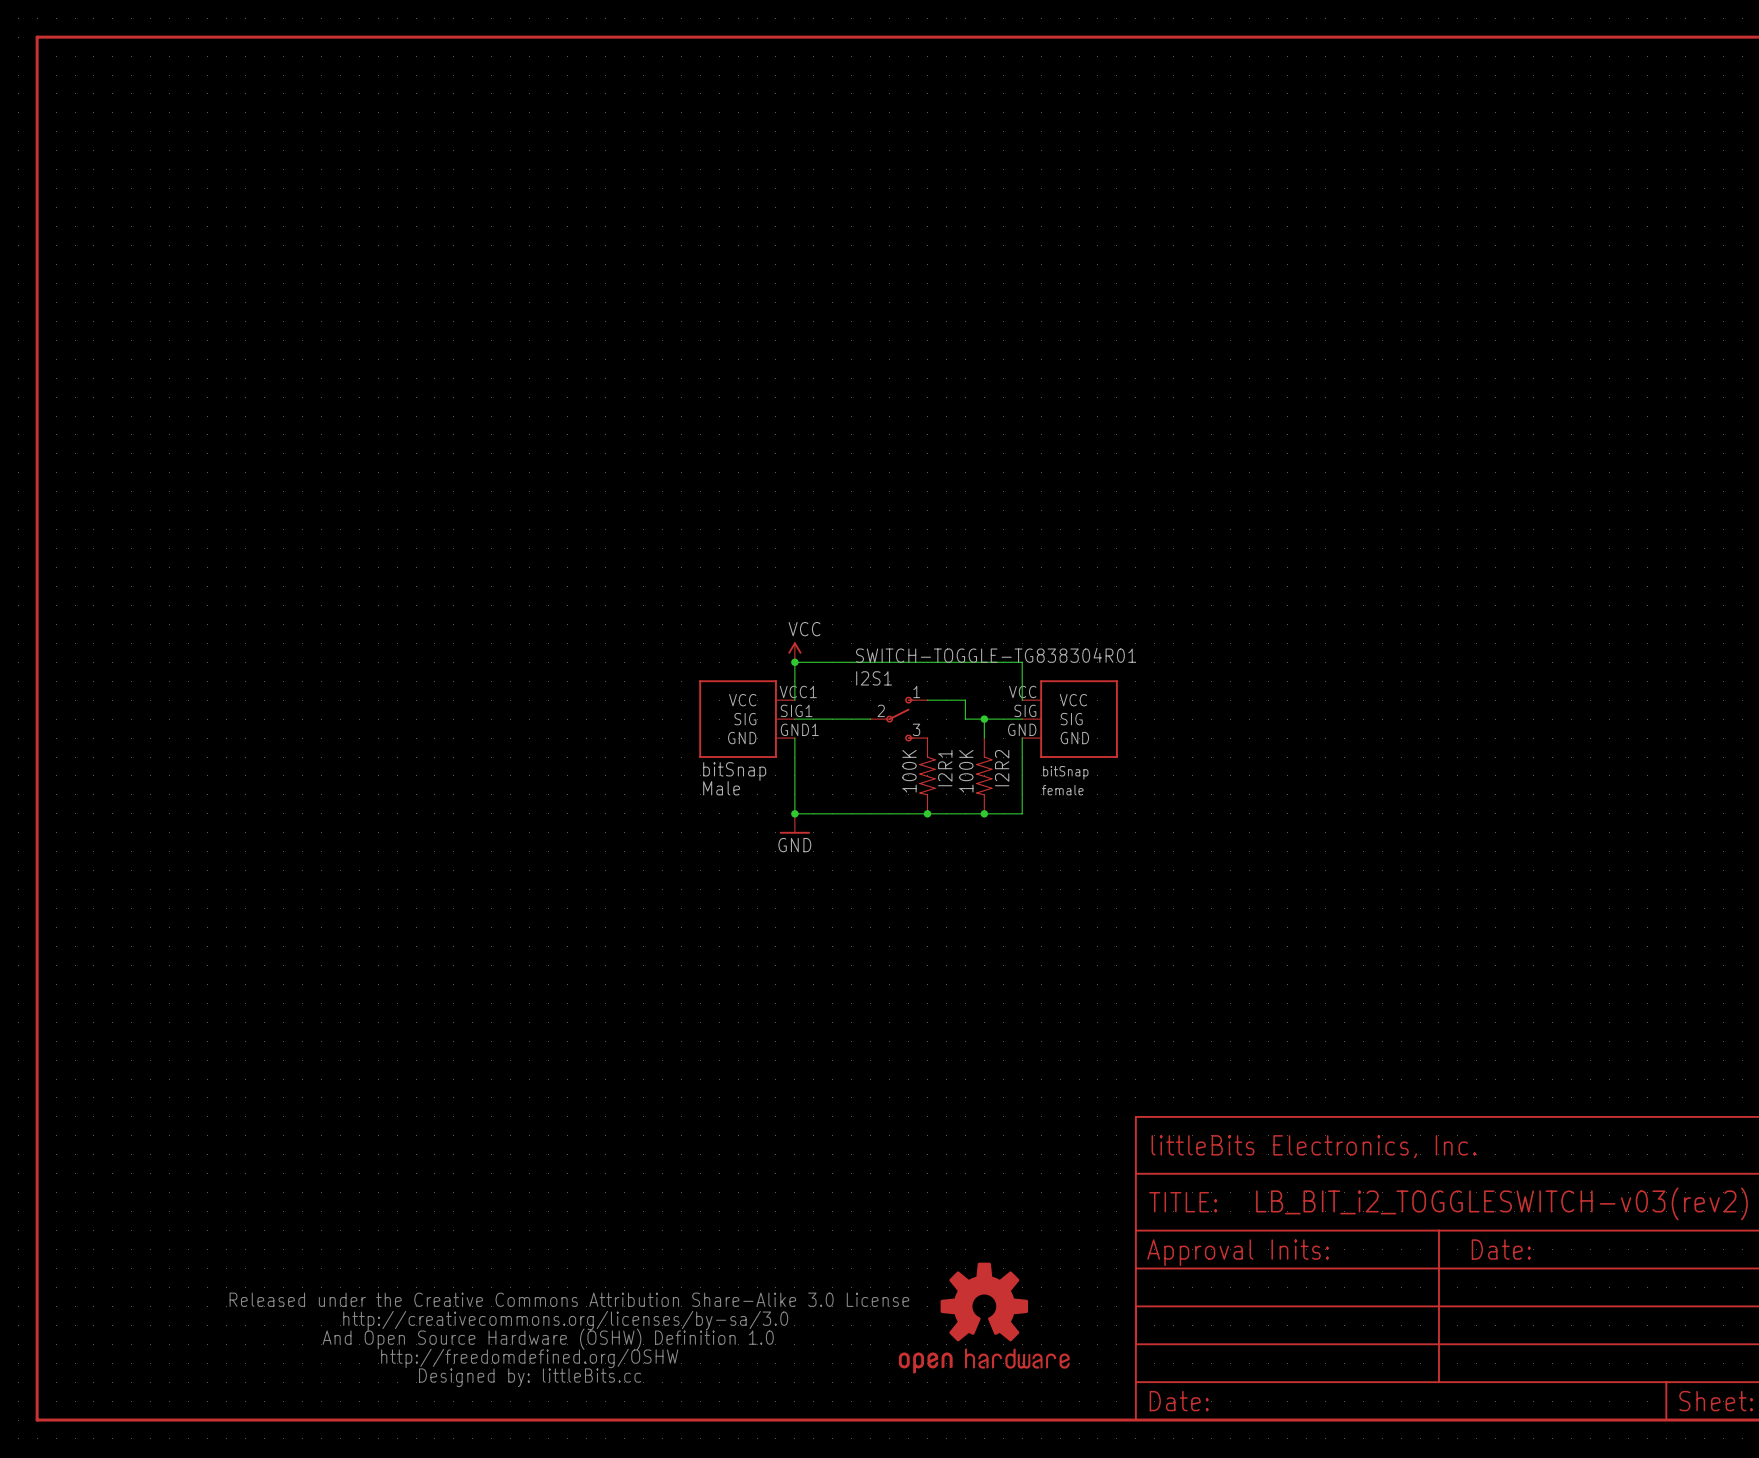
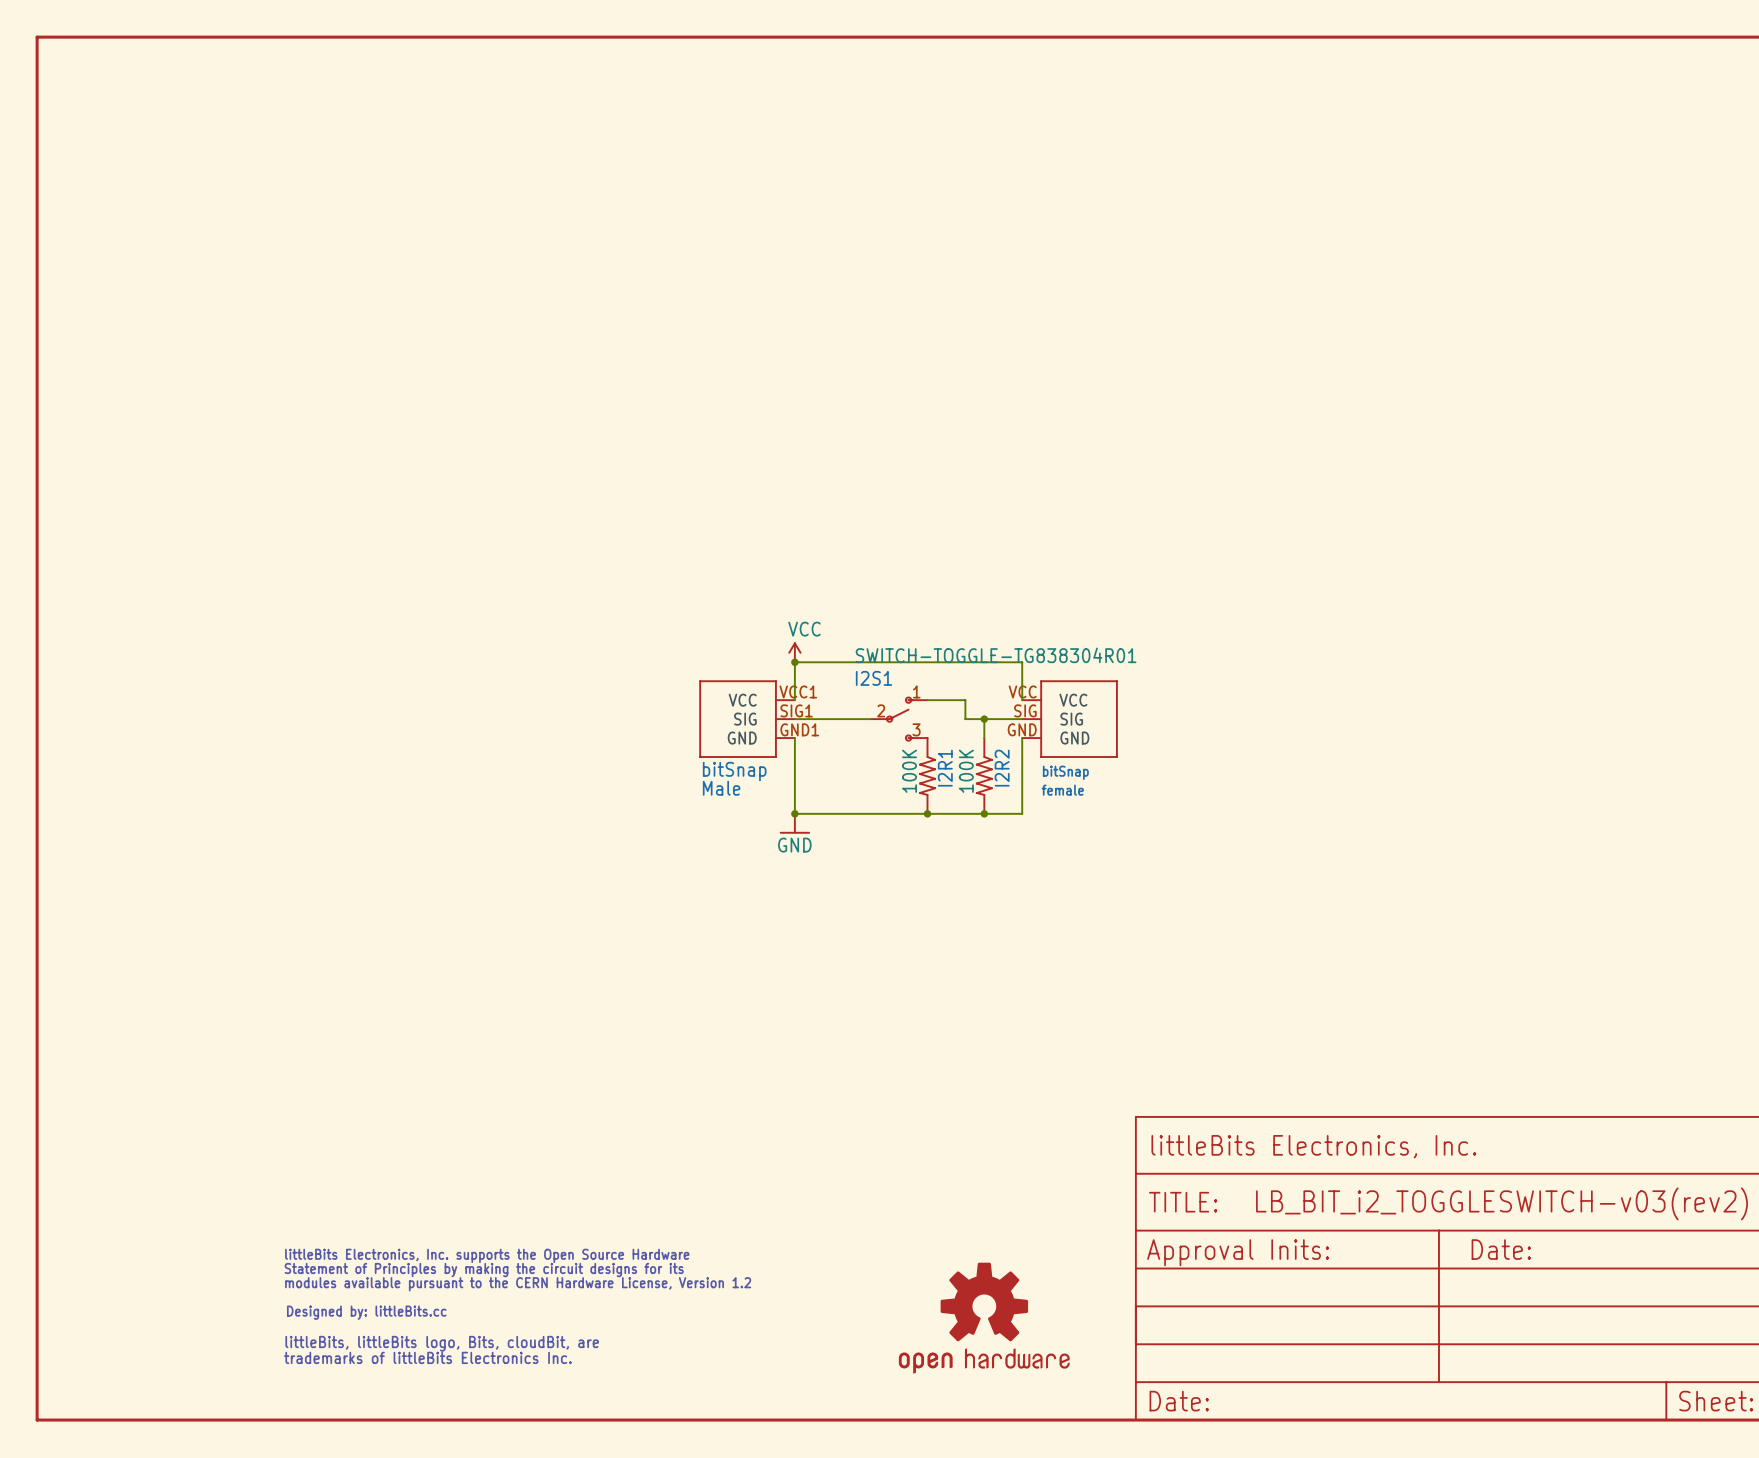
part: none -> (517, 1306)
part: (569, 1339) -> none

